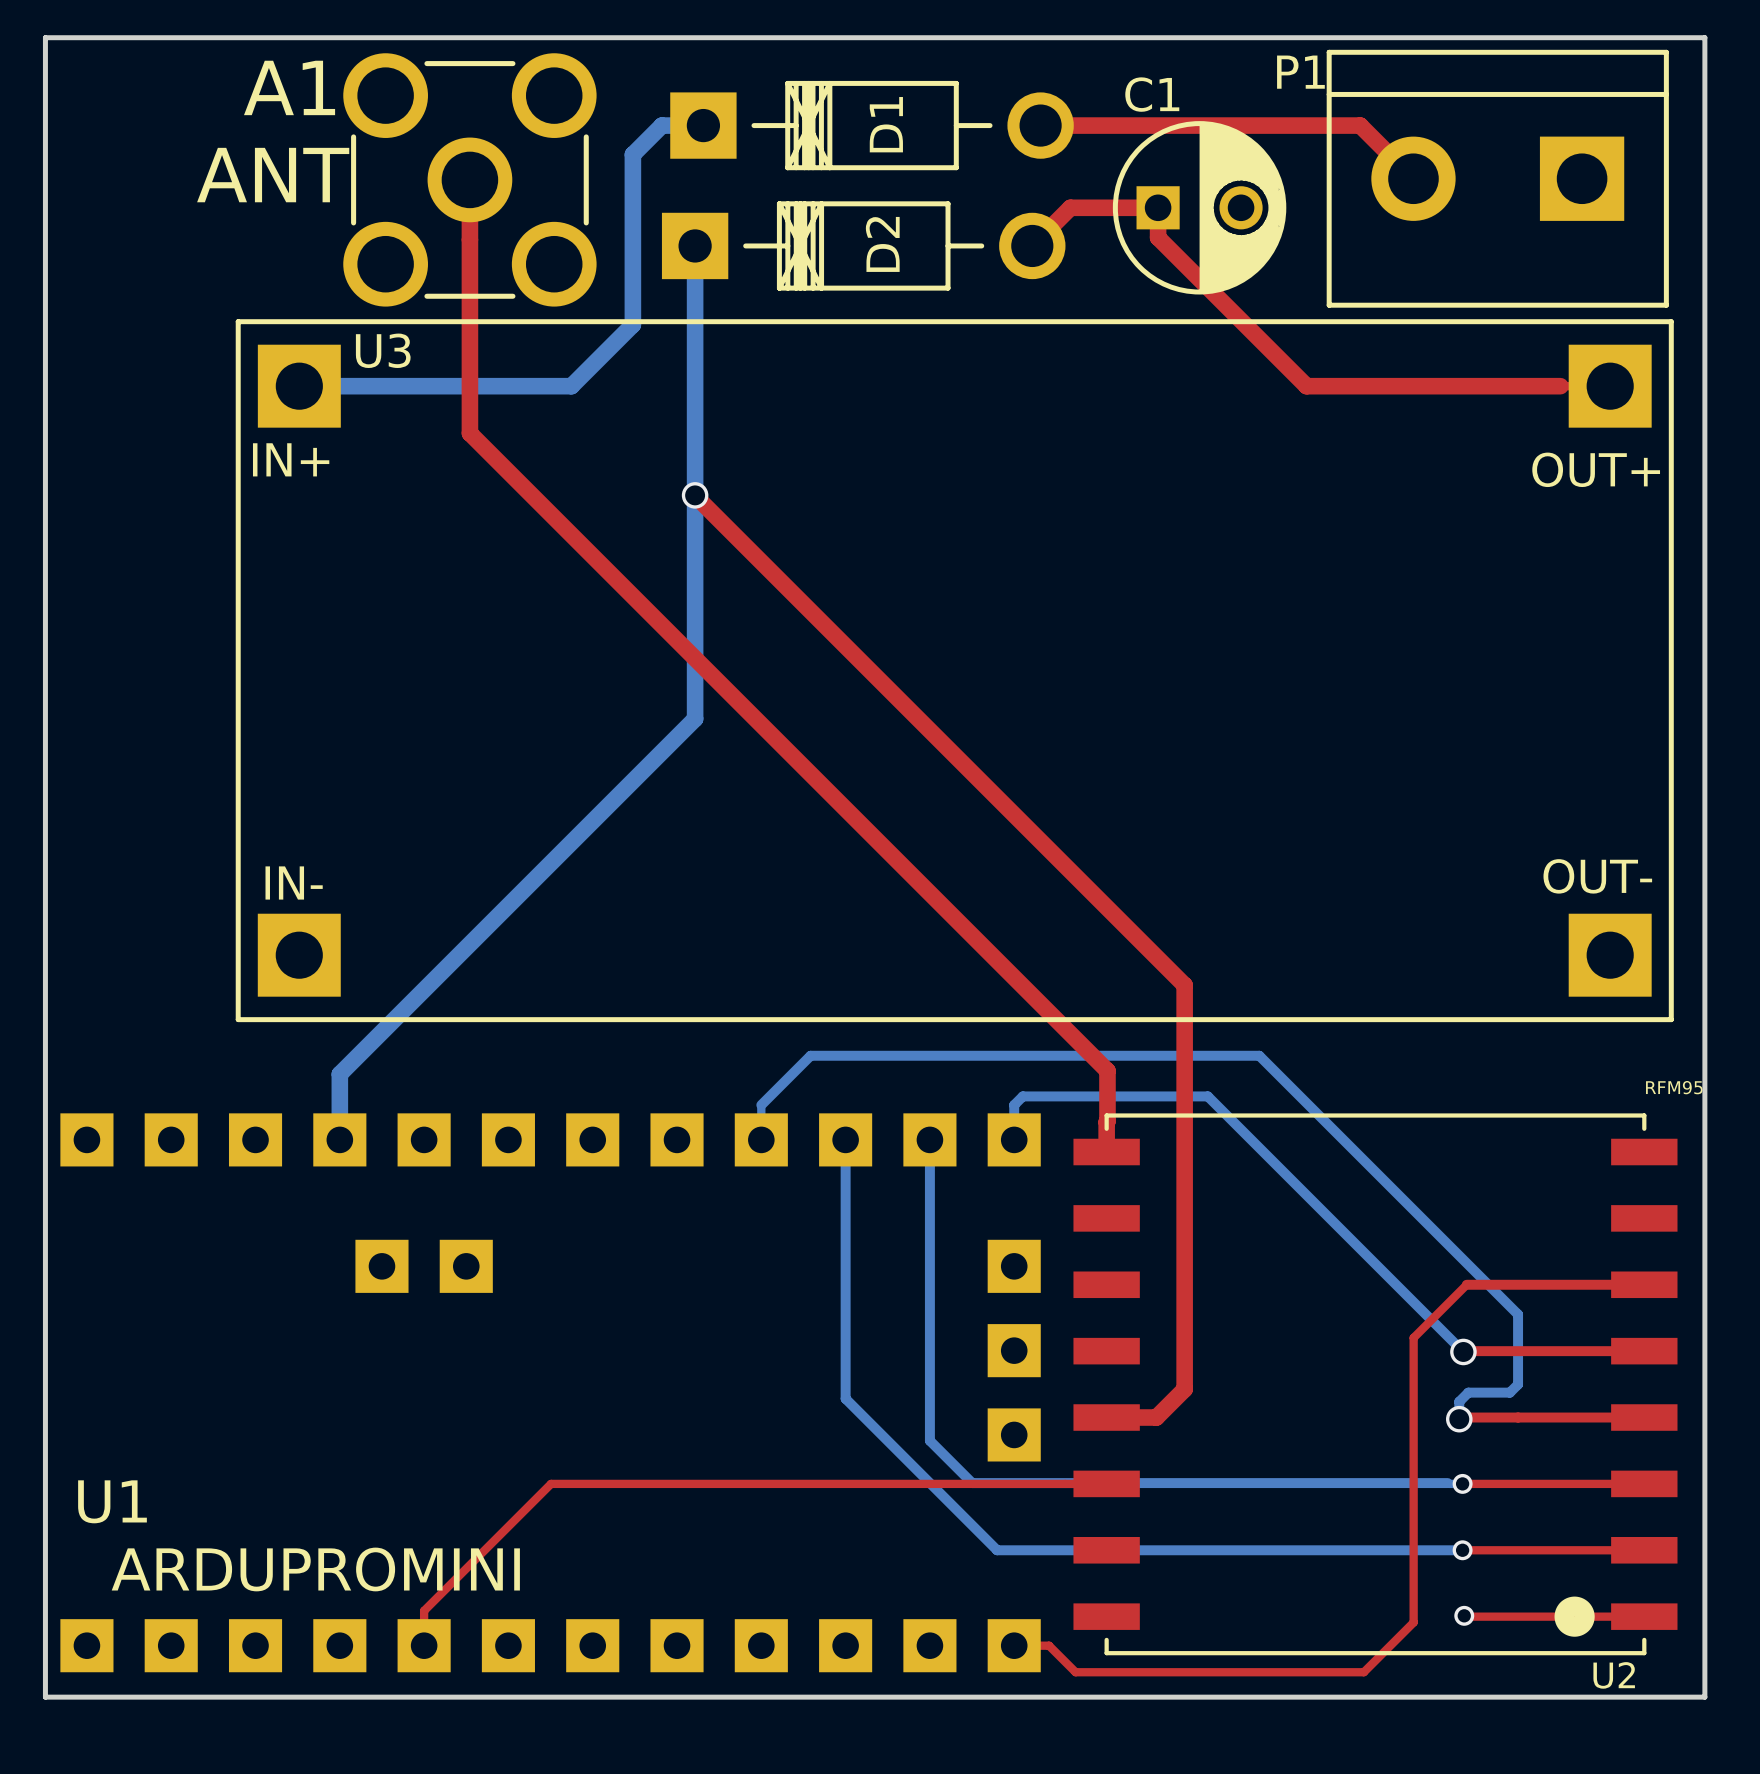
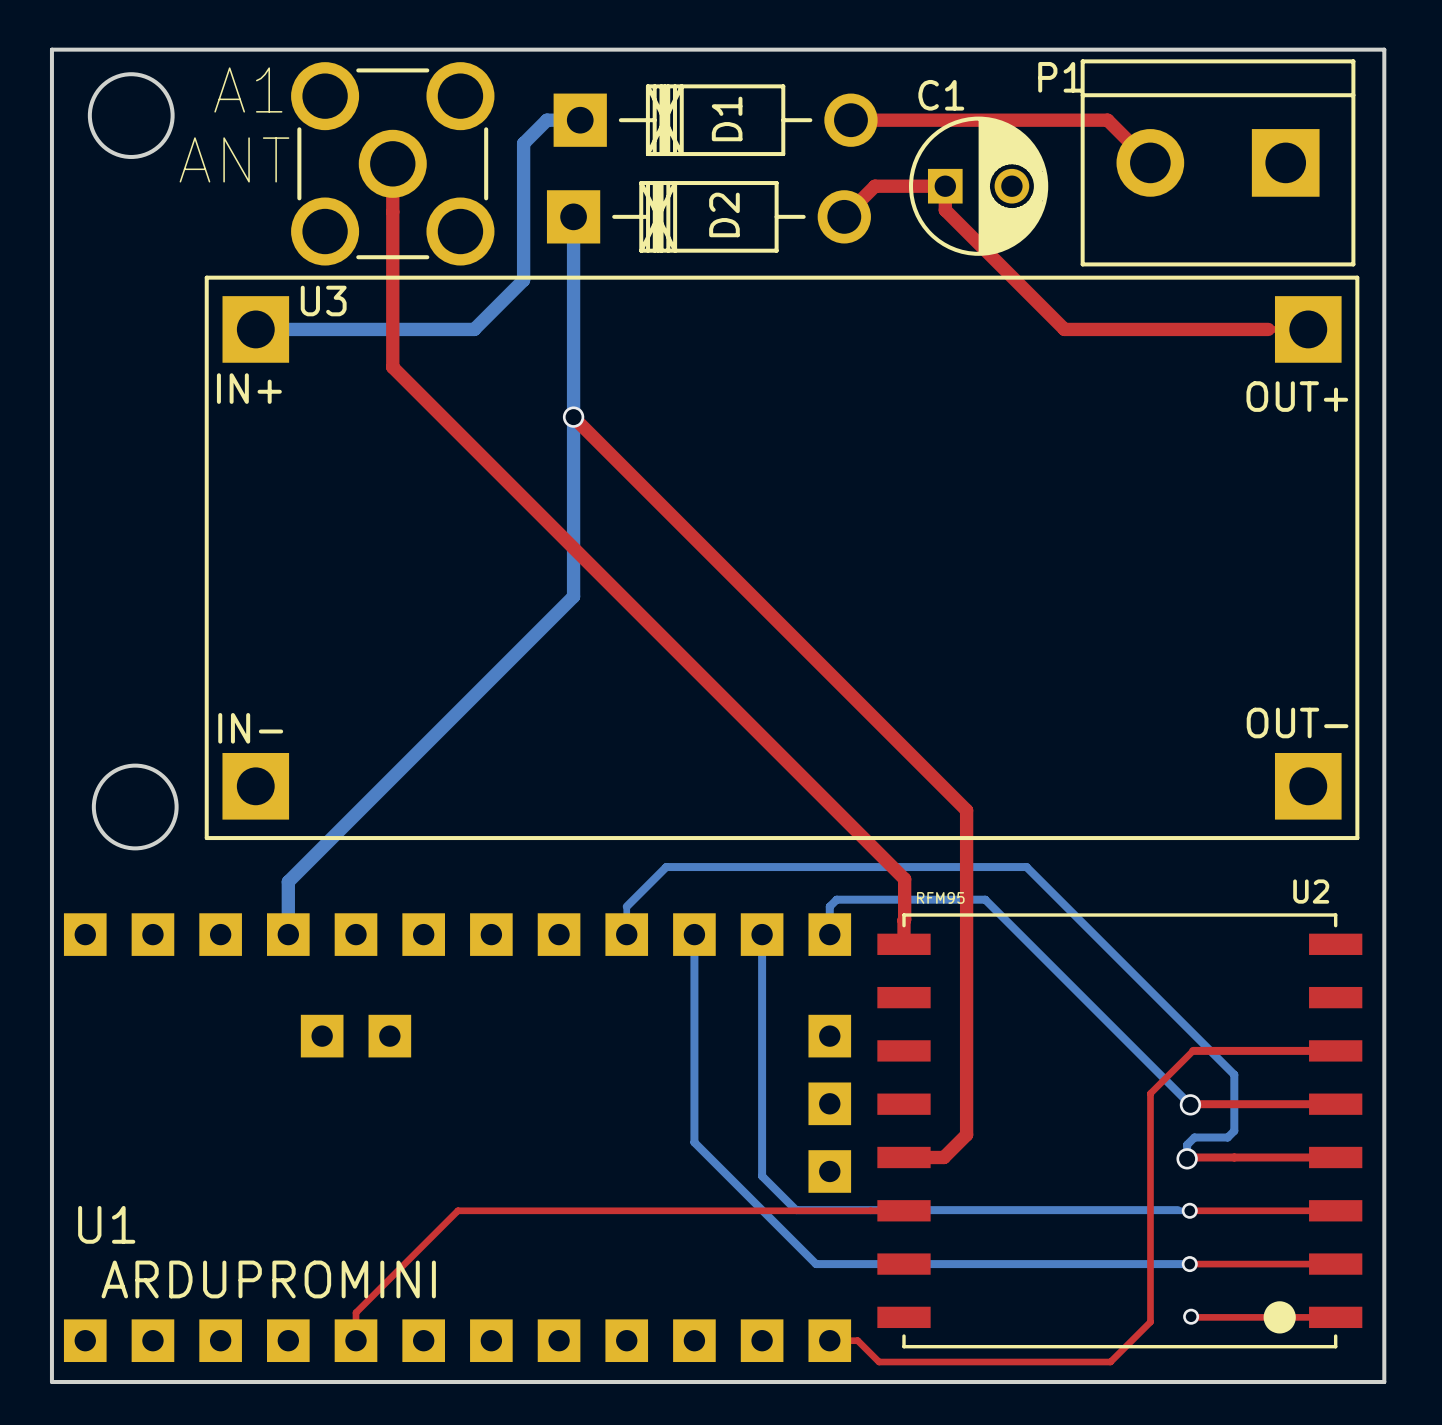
round board edge: none -> [87, 72, 175, 159]
round board edge: none -> [91, 763, 179, 851]
U2 value position: RFM95 (1674, 1087) -> RFM95 (940, 897)
U2 name position: U2 (1614, 1675) -> U2 (1311, 891)

